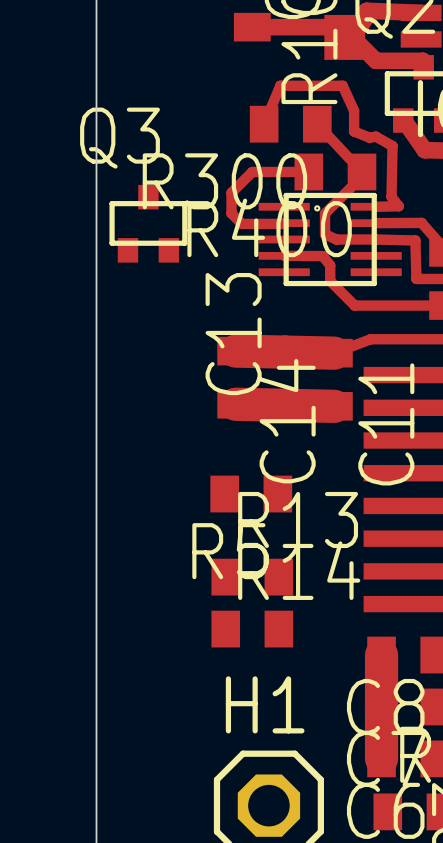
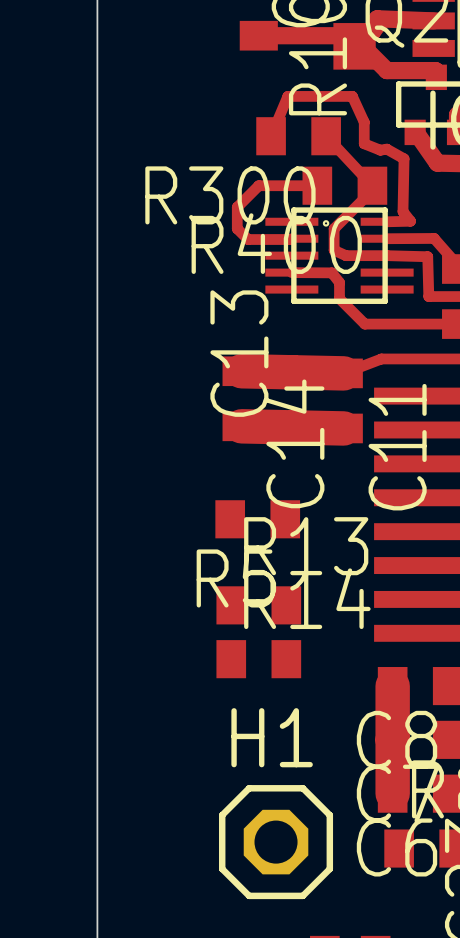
Q3: (148, 223) -> none

